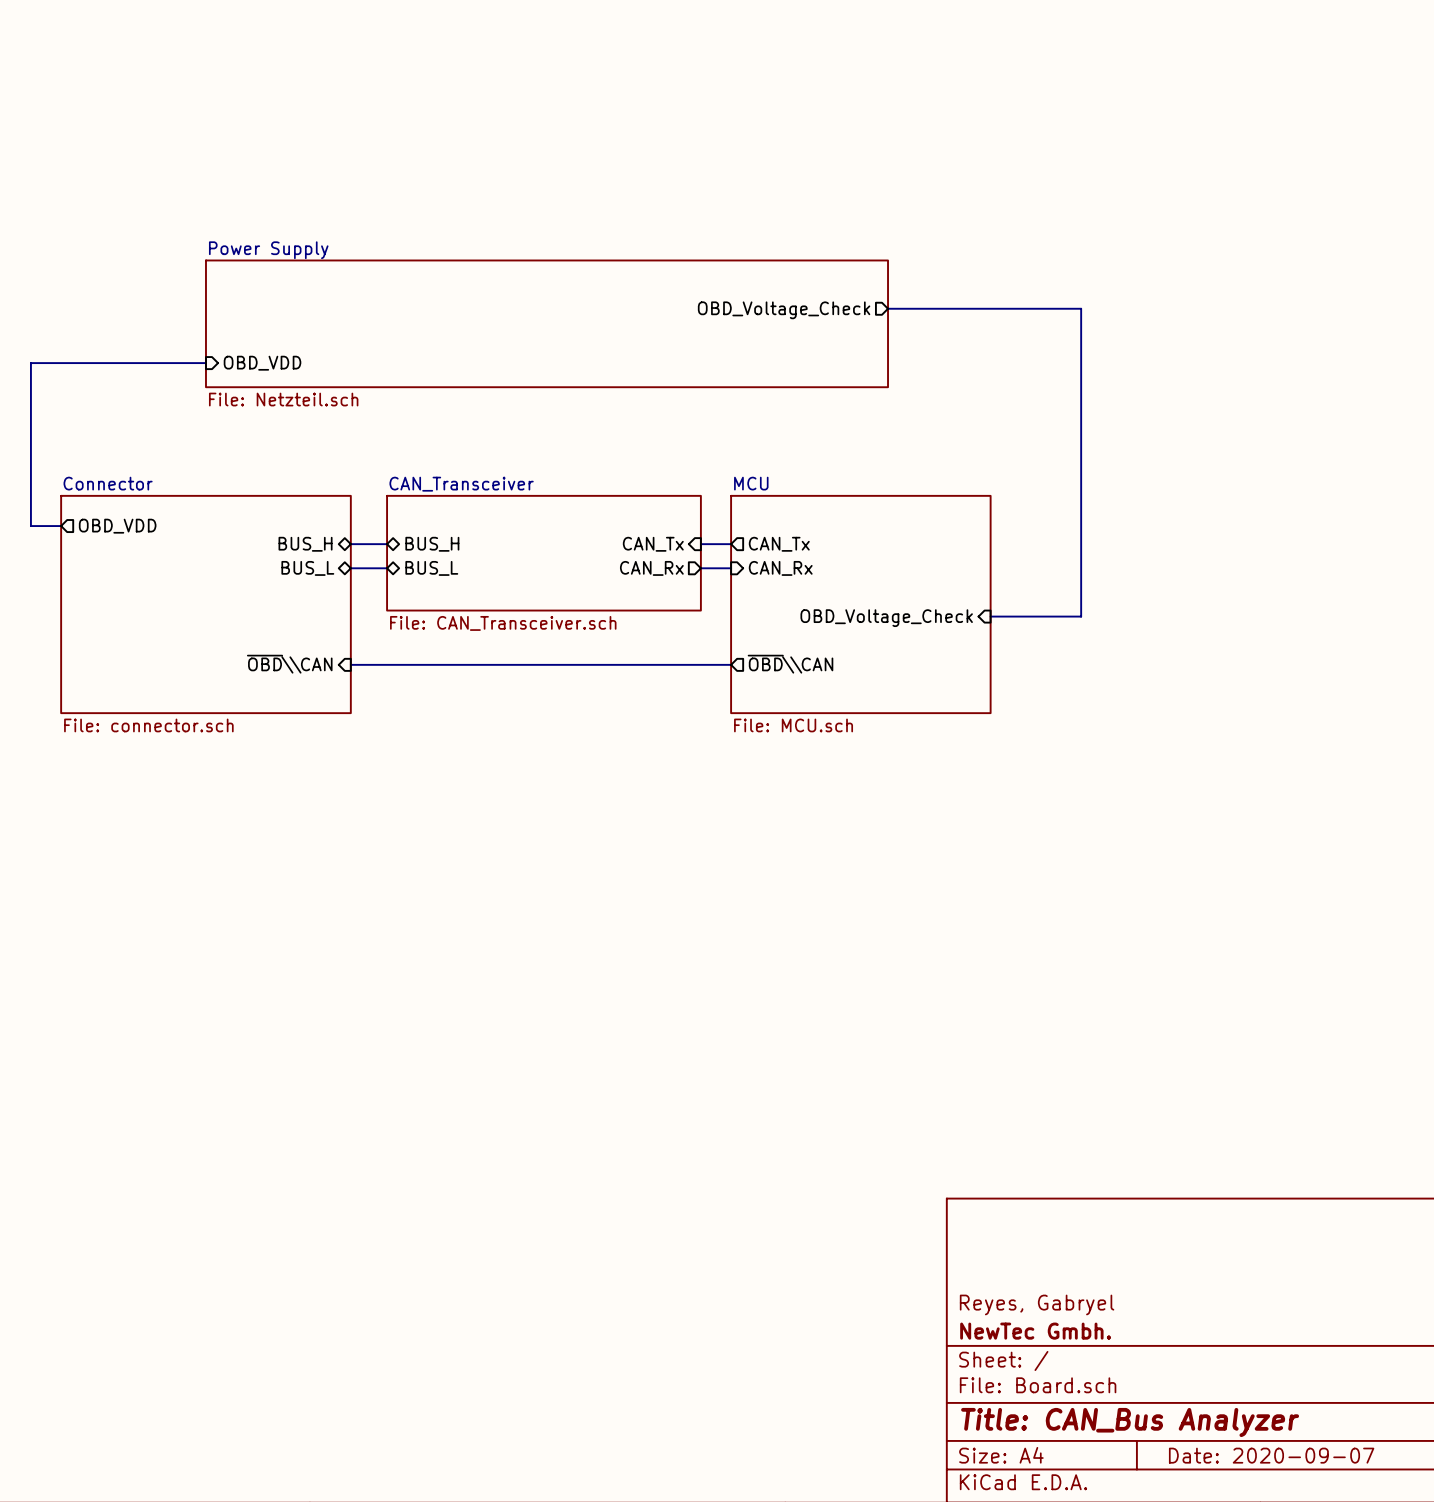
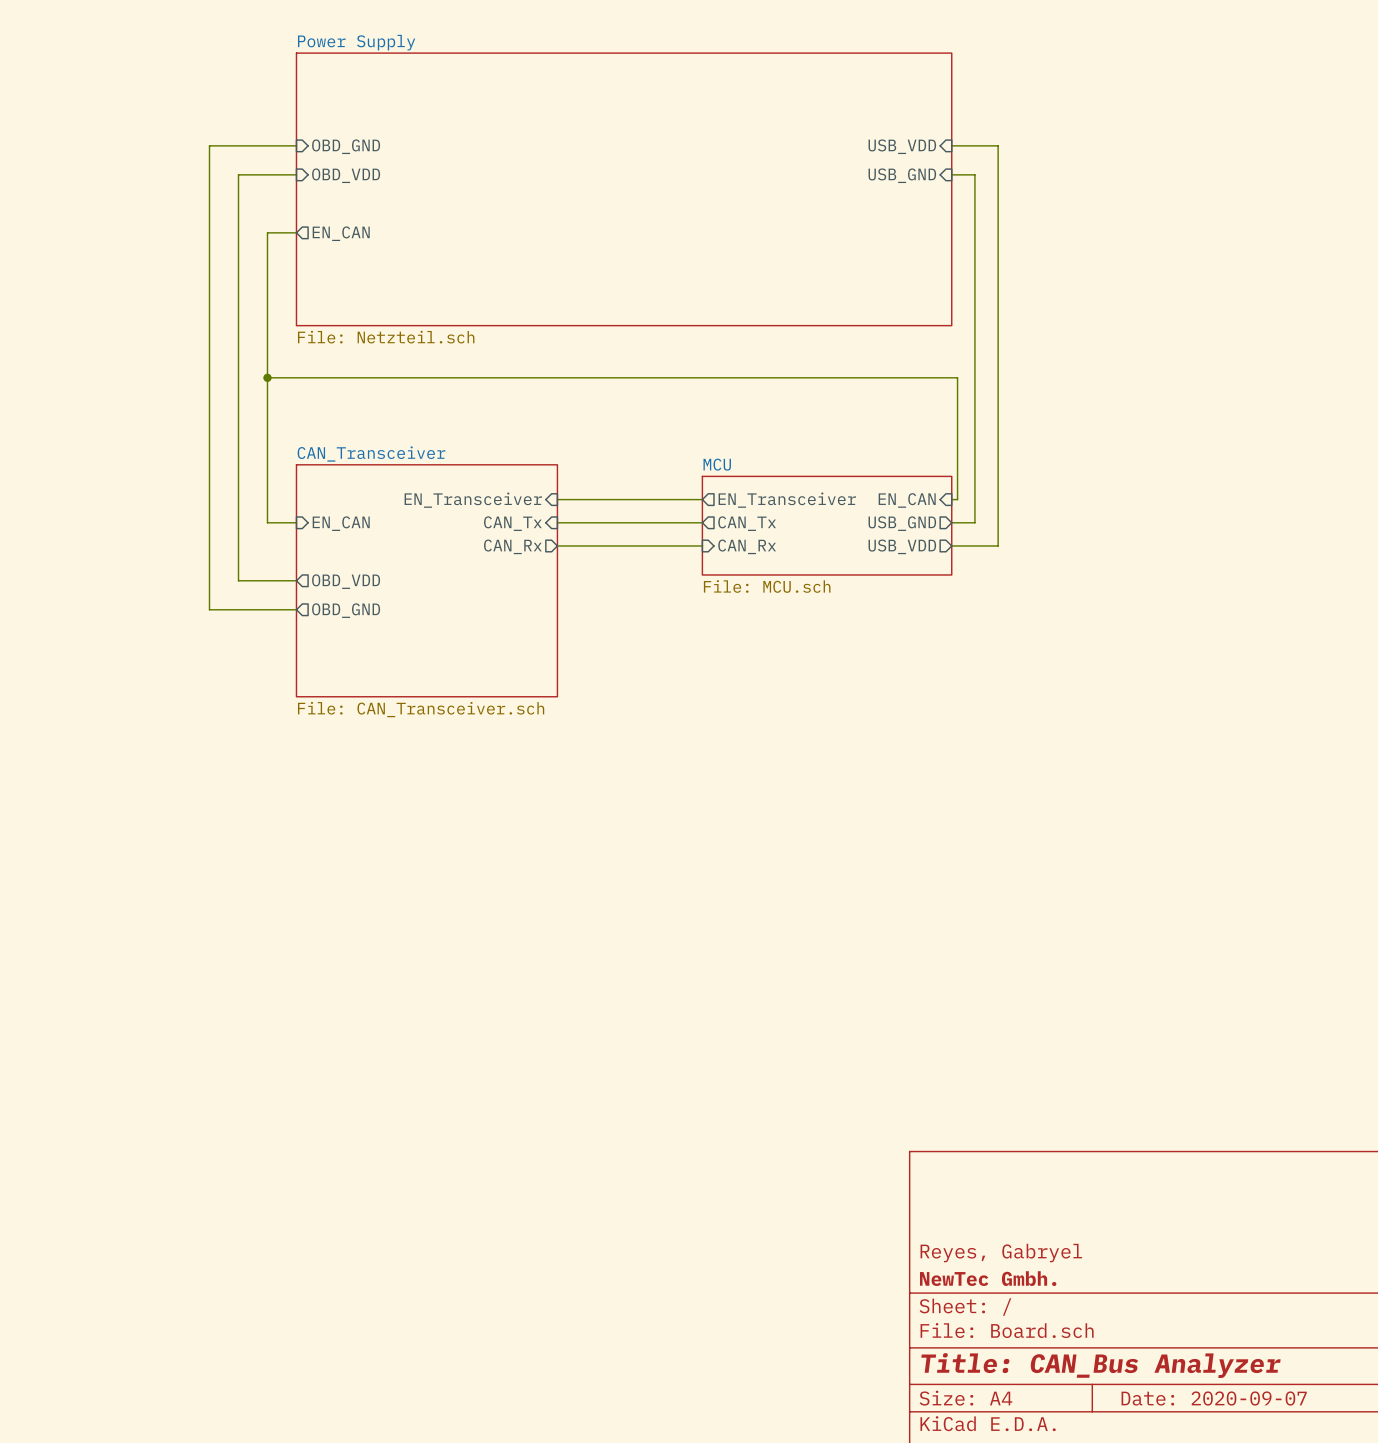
wire: none -> (296, 145) (209, 145) (209, 609) (296, 609)
sheet pin: none -> OBD_GND (346, 146)
sheet pin: none -> USB_VDD (902, 146)
wire: none -> (951, 145) (998, 145) (998, 545) (951, 545)
wire: none -> (296, 174) (238, 174) (238, 580) (296, 580)
sheet pin: none -> OBD_VDD (346, 175)
sheet pin: none -> USB_GND (902, 175)
wire: none -> (951, 174) (974, 174) (974, 522) (951, 522)
sheet Power Supply: none -> File: Netzteil.sch (624, 189)
wire: none -> (296, 232) (267, 232) (267, 522) (296, 522)
sheet pin: none -> EN_CAN (341, 233)
wire: (888, 308) (1081, 308) (1081, 616) (990, 616) -> none
sheet pin: OBD_Voltage_Check (784, 310) -> none
sheet Power Supply: File: Netzteil.sch (547, 323) -> none
wire: (205, 363) (30, 363) (30, 526) (61, 526) -> none
sheet pin: OBD_VDD (262, 363) -> none
wire: none -> (267, 377) (957, 377) (957, 499) (951, 499)
junction: none -> (267, 377)
sheet pin: none -> EN_Transceiver (473, 500)
wire: none -> (557, 499) (702, 499)
sheet pin: none -> EN_Transceiver (787, 500)
sheet pin: none -> EN_CAN (907, 500)
sheet pin: OBD_VDD (117, 526) -> none
sheet pin: BUS_H (305, 544) -> none
wire: (350, 544) (387, 544) -> none
sheet pin: none -> EN_CAN (341, 523)
sheet pin: BUS_H (432, 544) -> none
wire: none -> (557, 522) (673, 522)
sheet pin position: CAN_Tx (653, 544) -> CAN_Tx (512, 523)
sheet pin: none -> USB_GND (902, 523)
sheet MCU: none -> File: MCU.sch (827, 525)
sheet CAN_Transceiver: File: CAN_Transceiver.sch (543, 553) -> none
sheet pin: BUS_L (307, 568) -> none
wire: (350, 568) (387, 568) -> none
sheet pin: BUS_L (431, 568) -> none
wire: none -> (557, 545) (673, 545)
sheet pin position: CAN_Rx (651, 568) -> CAN_Rx (512, 546)
sheet pin: none -> USB_VDD (902, 546)
sheet Connector: File: connector.sch (205, 604) -> none
sheet pin: none -> OBD_VDD (346, 581)
sheet CAN_Transceiver: none -> File: CAN_Transceiver.sch (426, 580)
sheet MCU: File: MCU.sch (860, 604) -> none
sheet pin: OBD_Voltage_Check (886, 618) -> none
sheet pin: none -> OBD_GND (346, 610)
sheet pin: ~{OBD}\\CAN (289, 664) -> none
wire: (350, 664) (731, 664) -> none
sheet pin: ~{OBD}\\CAN (790, 664) -> none

